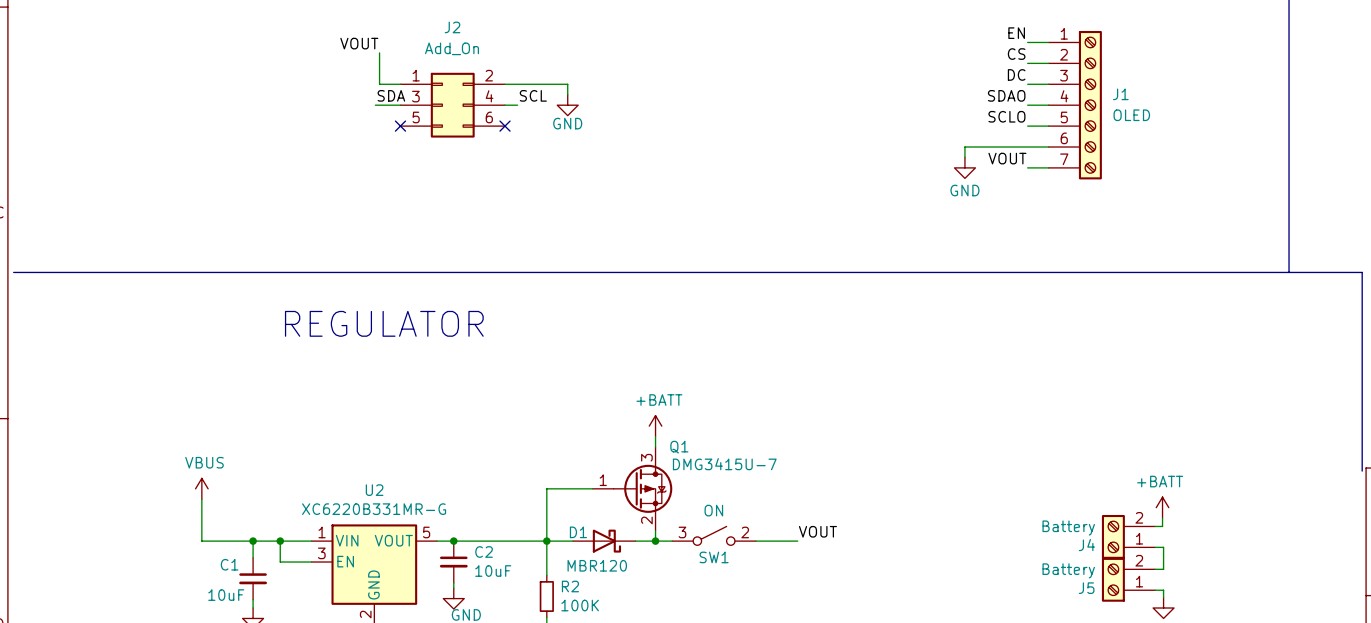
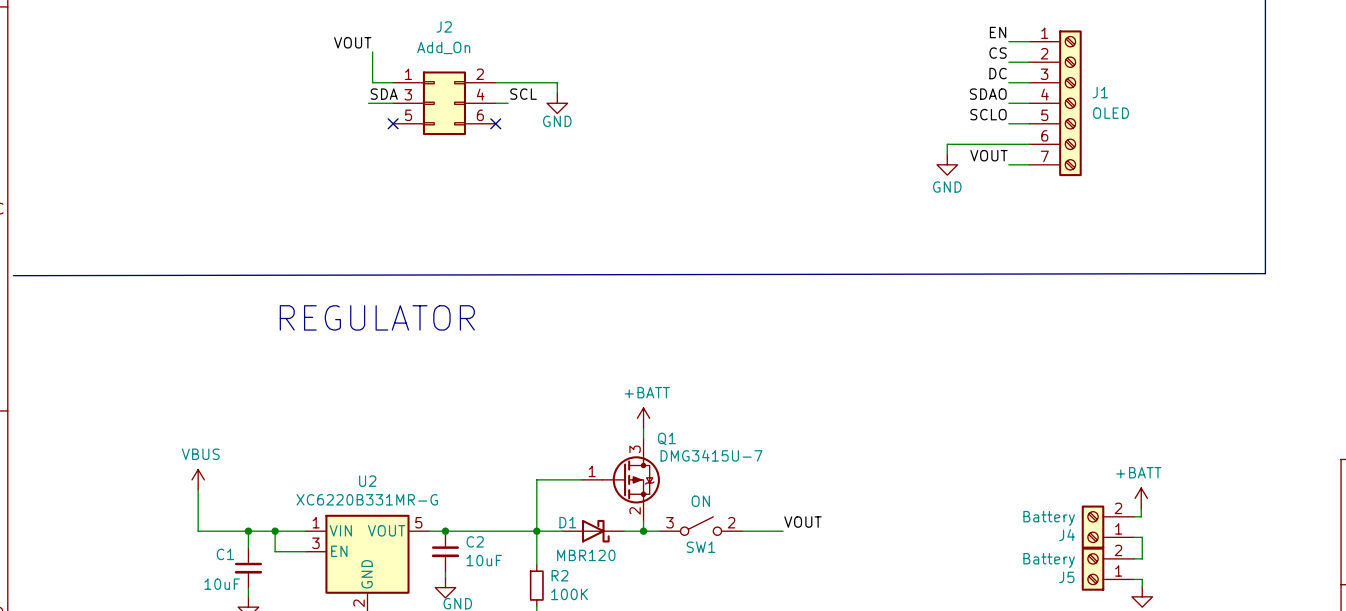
line: (13, 272) (1362, 272) (1362, 471) -> none
line: none -> (1265, 267) (1265, 273) (13, 275)

